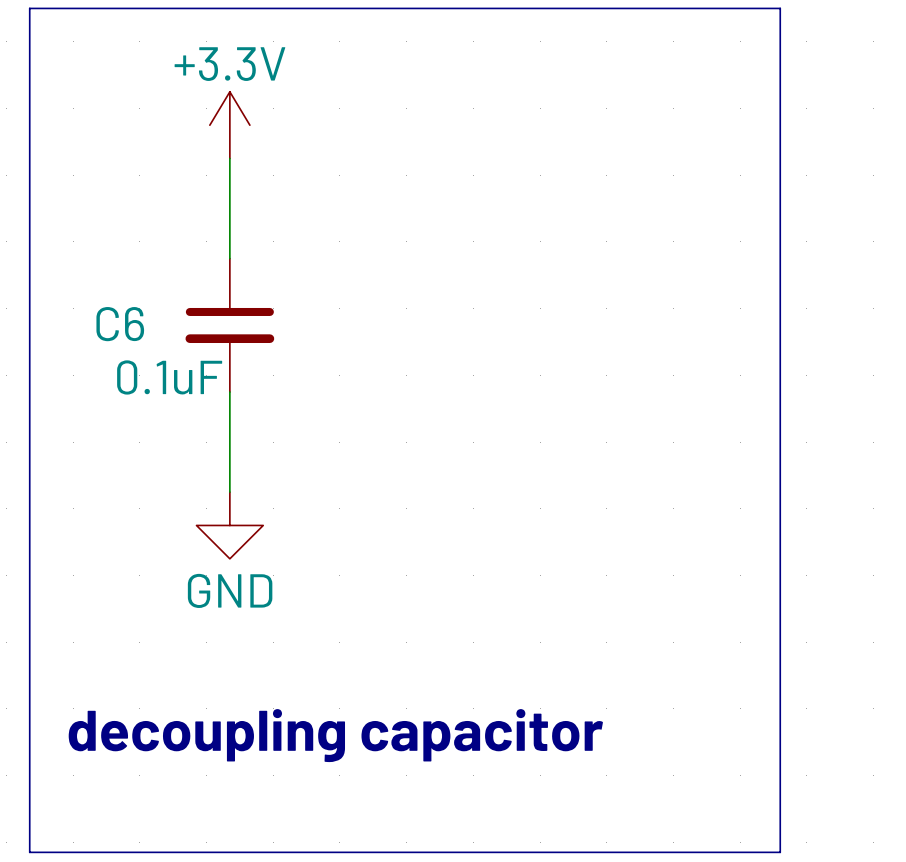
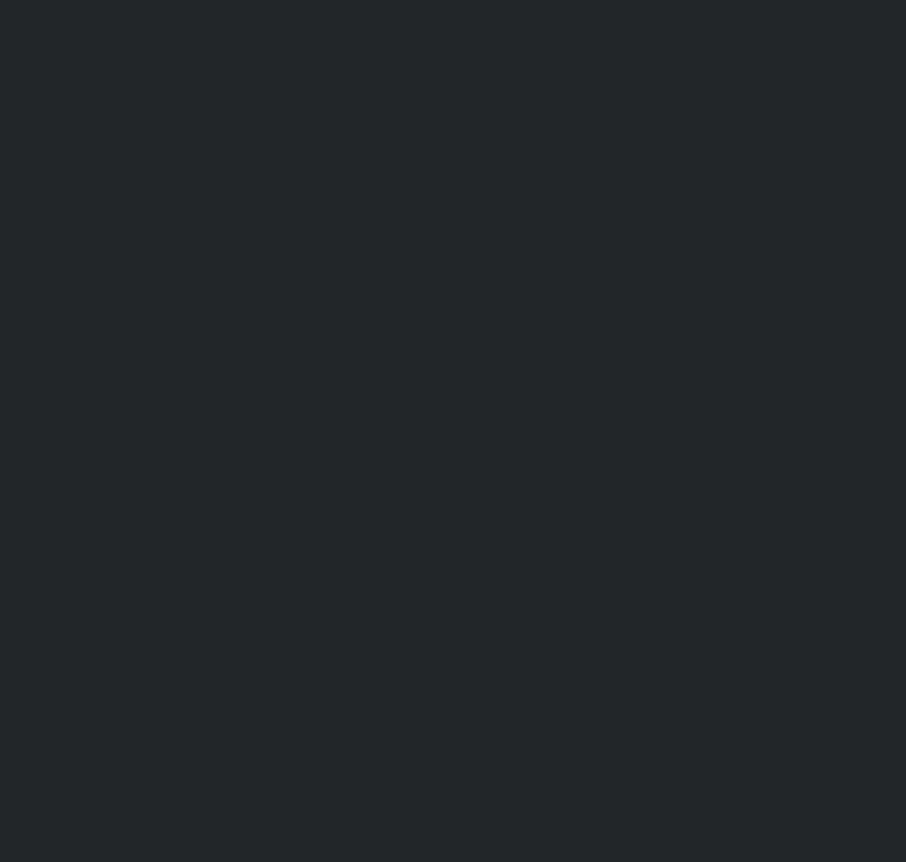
line: (29, 8) (780, 8) (780, 852) (29, 852) (29, 8) -> none
power symbol: +3.3V (229, 125) -> none
wire: (229, 158) (229, 258) -> none
C6: 0.1uF (229, 325) -> none
wire: (229, 392) (229, 492) -> none
power symbol: GND (229, 525) -> none
text: decoupling capacitor (335, 735) -> none

